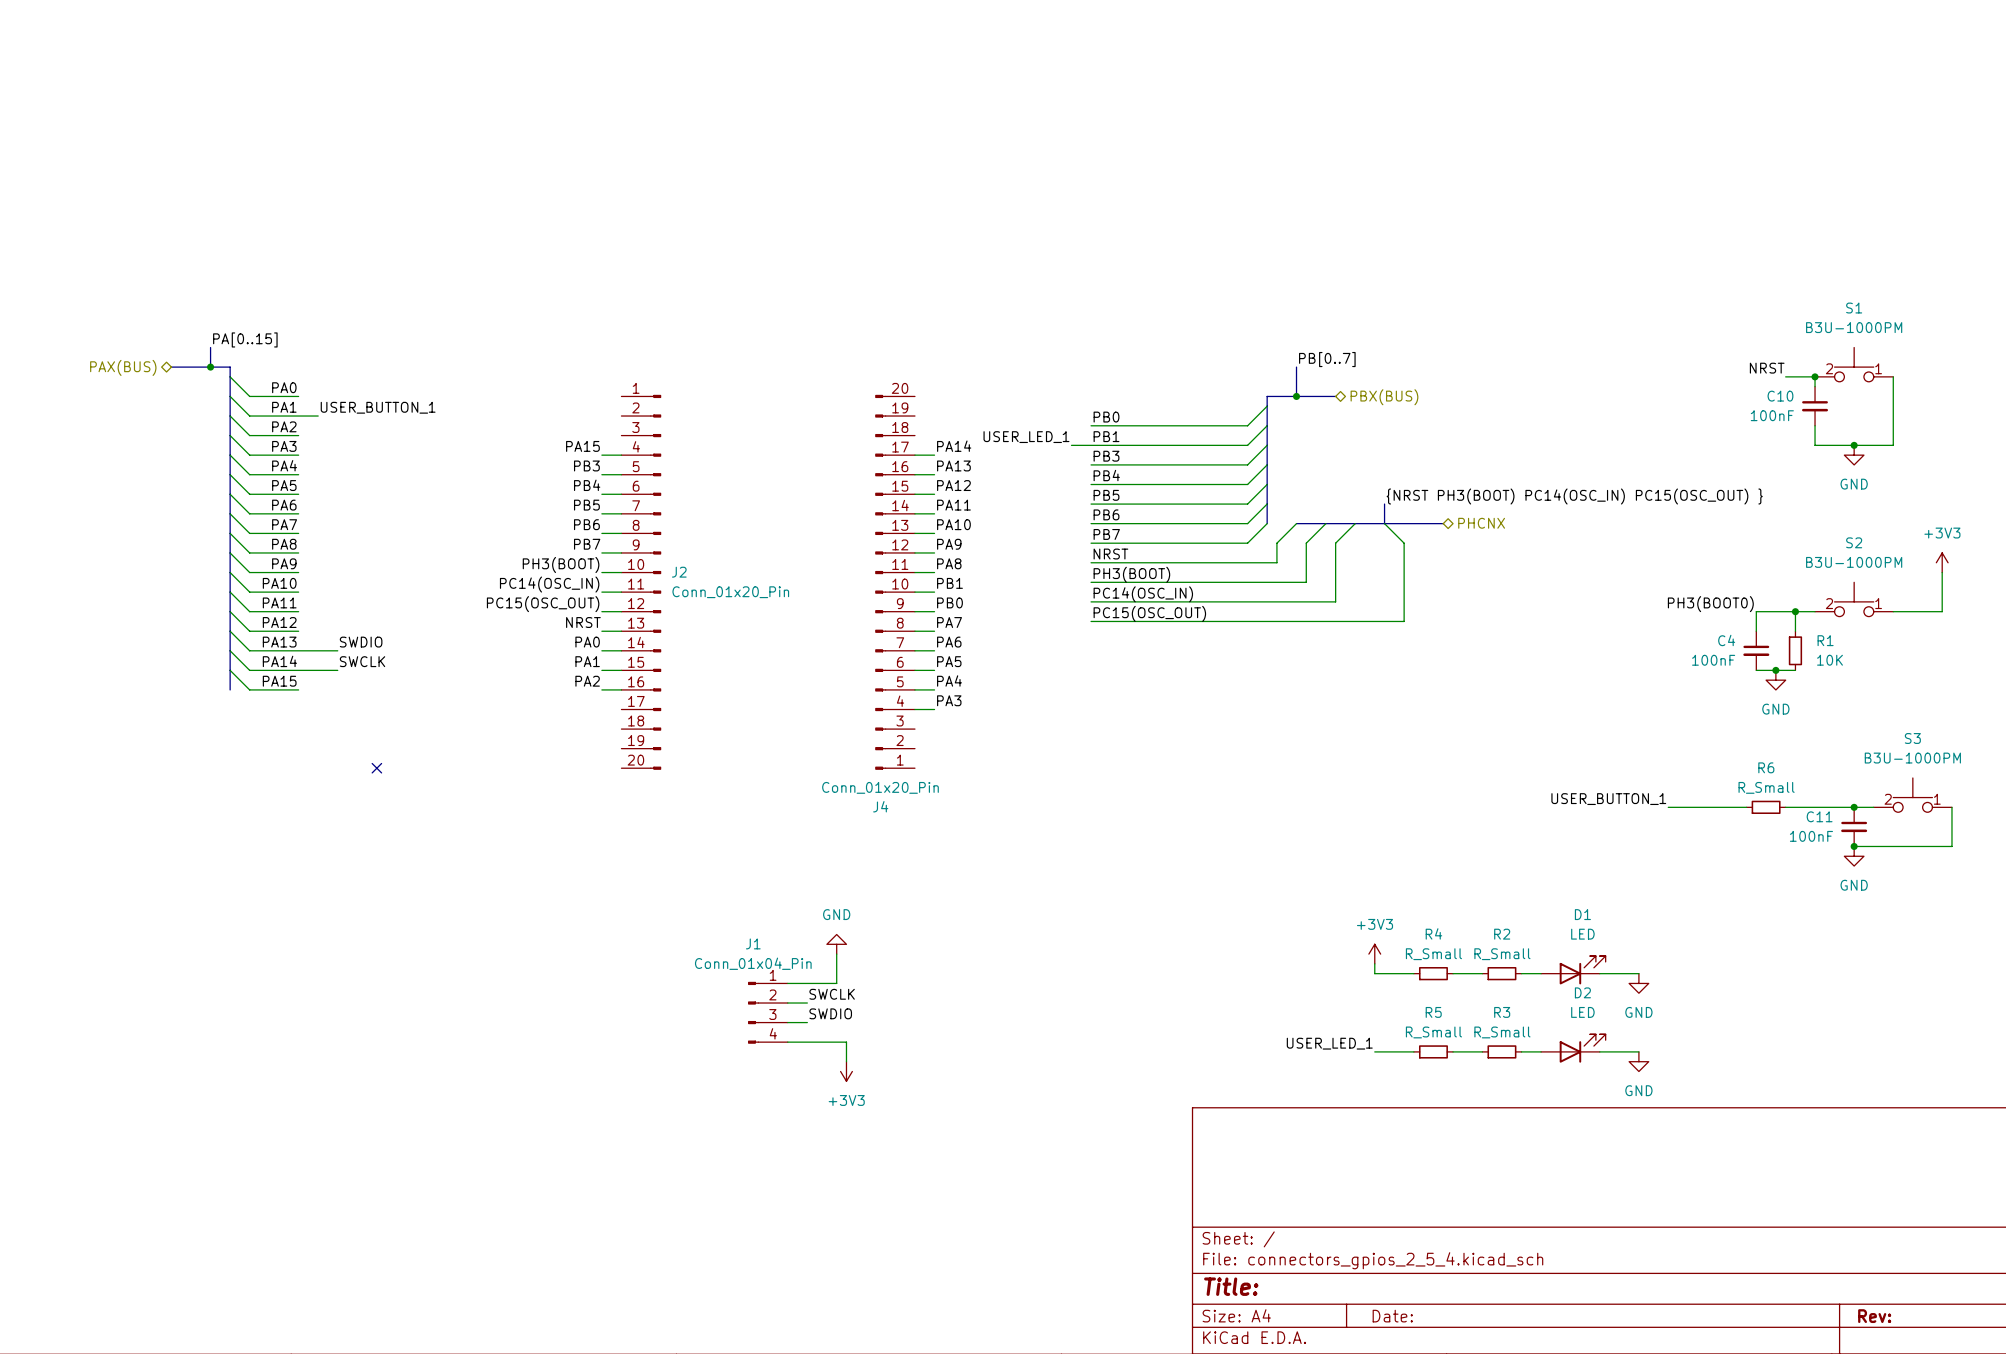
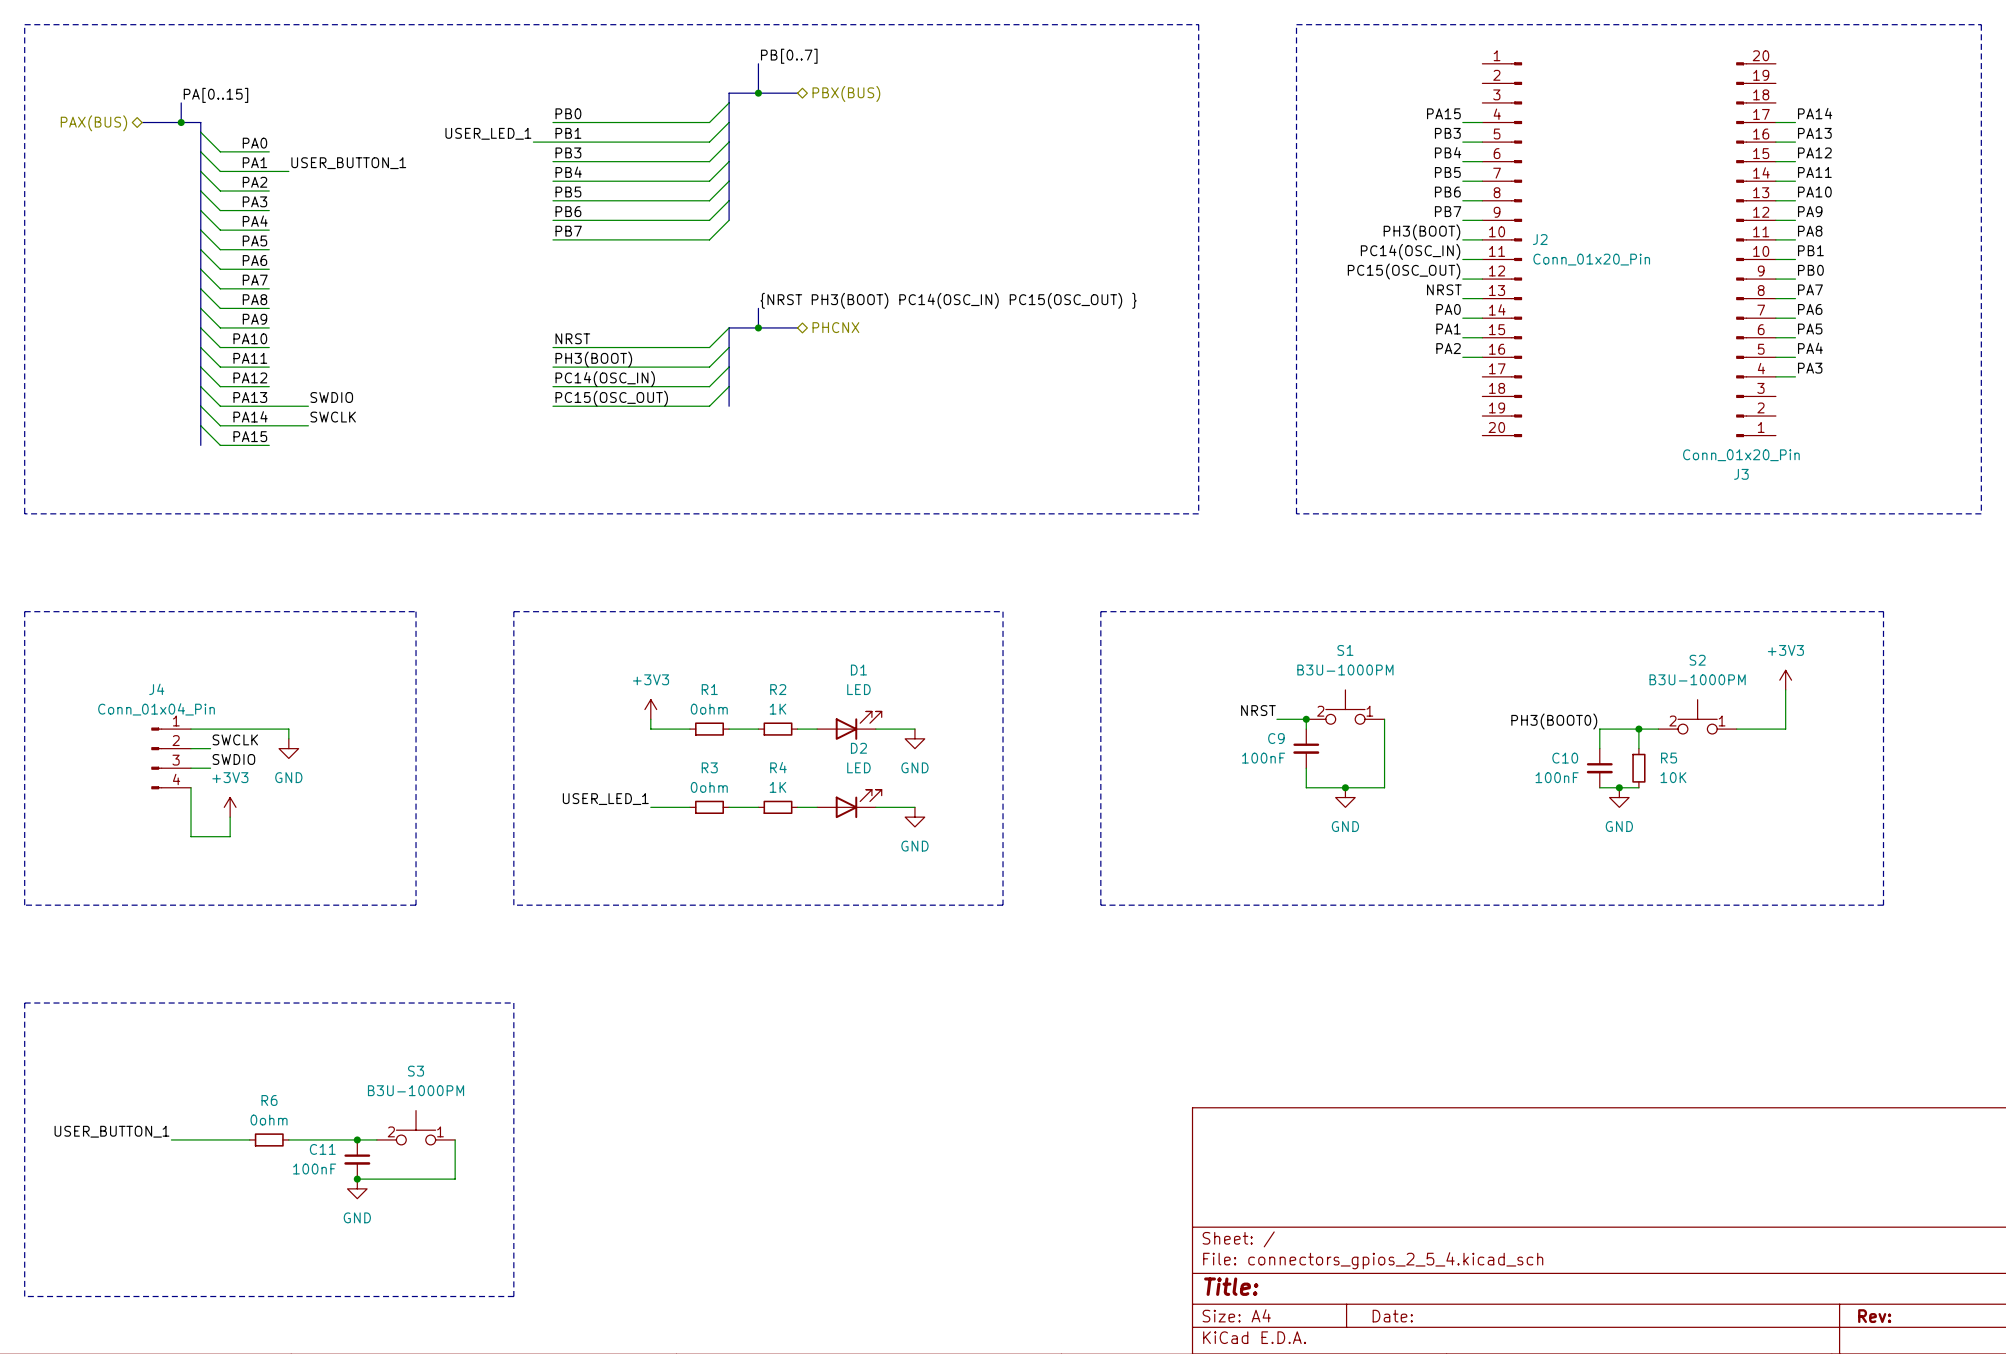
line: none -> (24, 24) (1198, 24) (1198, 513) (24, 513) (24, 24)
line: none -> (1296, 24) (1981, 24) (1981, 513) (1296, 513) (1296, 24)
label: none -> PB[0..7] (789, 56)
bus: none -> (758, 63) (758, 93)
junction: none -> (758, 93)
bus: none -> (797, 93) (729, 93) (729, 220)
hierarchical label: none -> PBX(BUS) (846, 93)
label: none -> PA[0..15] (216, 95)
bus: none -> (181, 102) (181, 122)
wire: none -> (729, 102) (709, 122) (552, 122)
label: none -> PB0 (568, 113)
label: none -> PA15 (1443, 113)
label: none -> PA14 (1815, 113)
bus: none -> (142, 122) (200, 122) (200, 445)
junction: none -> (181, 122)
wire: none -> (729, 122) (709, 142) (533, 142)
wire: none -> (1462, 122) (1482, 122)
wire: none -> (1775, 122) (1795, 122)
hierarchical label: none -> PAX(BUS) (93, 123)
wire: none -> (200, 132) (220, 151) (269, 151)
label: none -> USER_LED_1 (488, 133)
label: none -> PB1 (568, 133)
label: none -> PB3 (1447, 133)
label: none -> PA13 (1814, 133)
wire: none -> (729, 142) (709, 161) (552, 161)
wire: none -> (1462, 142) (1482, 142)
wire: none -> (1775, 142) (1795, 142)
label: none -> PA0 (254, 143)
wire: none -> (200, 151) (220, 171) (288, 171)
label: none -> PB3 (568, 152)
label: none -> PB4 (1448, 152)
label: none -> PA12 (1814, 152)
wire: none -> (729, 161) (709, 181) (552, 181)
wire: none -> (1462, 161) (1482, 161)
wire: none -> (1775, 161) (1795, 161)
label: none -> PA1 (254, 162)
label: none -> USER_BUTTON_1 (348, 163)
wire: none -> (200, 171) (220, 191) (269, 191)
label: none -> PB4 (568, 172)
label: none -> PB5 (1447, 172)
label: none -> PA11 (1814, 172)
wire: none -> (729, 181) (709, 200) (552, 200)
wire: none -> (1462, 181) (1482, 181)
wire: none -> (1775, 181) (1795, 181)
label: none -> PA2 (254, 182)
label: none -> PB5 (568, 192)
label: none -> PB6 (1447, 192)
label: none -> PA10 (1814, 192)
wire: none -> (729, 200) (709, 220) (552, 220)
wire: none -> (1462, 200) (1482, 200)
wire: none -> (1775, 200) (1795, 200)
label: none -> PA3 (254, 201)
wire: none -> (200, 210) (220, 230) (269, 230)
label: none -> PB6 (568, 211)
label: none -> PB7 (1448, 211)
label: none -> PA9 (1810, 211)
wire: none -> (729, 220) (709, 239) (552, 239)
wire: none -> (1462, 220) (1482, 220)
wire: none -> (1775, 220) (1795, 220)
label: none -> PA4 (255, 221)
label: none -> PB7 (568, 231)
label: none -> PA8 (1810, 231)
label: none -> PH3(BOOT) (1421, 232)
wire: none -> (1462, 239) (1482, 239)
wire: none -> (1775, 239) (1795, 239)
label: none -> PA5 (254, 240)
J3: none -> Conn_01x20_Pin (1756, 249)
label: none -> PB1 (1810, 250)
label: none -> PC14(OSC_IN) (1410, 251)
wire: none -> (1462, 259) (1482, 259)
wire: none -> (1775, 259) (1795, 259)
label: none -> PA6 (254, 260)
label: none -> PB0 (1810, 270)
label: none -> PC15(OSC_OUT) (1404, 271)
wire: none -> (1462, 279) (1482, 279)
wire: none -> (1775, 279) (1795, 279)
label: none -> PA7 (255, 280)
label: none -> NRST (1444, 289)
label: none -> PA7 (1810, 289)
wire: none -> (1462, 298) (1482, 298)
wire: none -> (1775, 298) (1795, 298)
label: none -> PA8 (254, 299)
label: none -> {NRST PH3(BOOT) PC14(OSC_IN) PC15(OSC_OUT) } (948, 300)
bus: none -> (758, 308) (758, 327)
label: none -> PA0 (1448, 309)
label: none -> PA6 (1810, 309)
wire: none -> (1462, 318) (1482, 318)
wire: none -> (1775, 318) (1795, 318)
label: none -> PA9 (254, 319)
wire: none -> (729, 327) (709, 347) (552, 347)
junction: none -> (758, 327)
bus: none -> (797, 327) (729, 327) (729, 406)
hierarchical label: none -> PHCNX (835, 327)
label: none -> PA1 (1448, 329)
label: none -> PA5 (1810, 329)
wire: none -> (1462, 337) (1482, 337)
wire: none -> (1775, 337) (1795, 337)
label: none -> PA10 (250, 338)
label: none -> NRST (572, 338)
label: PA[0..15] (245, 339) -> none
bus: (210, 347) (210, 367) -> none
wire: none -> (729, 347) (709, 367) (552, 367)
label: none -> PA2 (1448, 348)
label: none -> PA4 (1810, 348)
wire: none -> (1462, 357) (1482, 357)
wire: none -> (1775, 357) (1795, 357)
label: none -> PA11 (250, 358)
label: none -> PH3(BOOT) (593, 359)
label: PB[0..7] (1327, 359) -> none
S1 position: (1854, 364) -> (1345, 707)
hierarchical label: PAX(BUS) (123, 367) -> none
bus: (171, 367) (230, 367) (230, 689) -> none
junction: (210, 367) -> none
wire: none -> (729, 367) (709, 386) (552, 386)
bus: (1296, 367) (1296, 396) -> none
label: NRST (1767, 368) -> none
label: none -> PA3 (1810, 368)
wire: (230, 376) (249, 396) (298, 396) -> (200, 191) (220, 210) (269, 210)
wire: none -> (1775, 376) (1785, 376)
wire: (1795, 376) (1815, 376) (1815, 386) -> none
junction: (1815, 376) -> none
wire: (1893, 376) (1893, 445) (1815, 445) (1815, 425) -> none
label: none -> PA12 (250, 377)
label: none -> PC14(OSC_IN) (605, 379)
wire: none -> (200, 386) (220, 406) (308, 406)
wire: none -> (729, 386) (709, 406) (552, 406)
label: PA0 (284, 387) -> none
J4 symbol: [875, 394, 915, 770] -> [151, 727, 192, 790]
wire: (230, 396) (249, 416) (318, 416) -> none
junction: (1296, 396) -> none
bus: (1335, 396) (1267, 396) (1267, 523) -> none
label: none -> PA13 (250, 397)
label: none -> SWDIO (331, 397)
hierarchical label: PBX(BUS) (1384, 397) -> none
label: none -> PC15(OSC_OUT) (611, 398)
wire: none -> (200, 406) (220, 425) (308, 425)
wire: (1267, 406) (1247, 425) (1091, 425) -> none
C10 position: (1815, 406) -> (1599, 768)
label: PA1 (284, 407) -> none
label: USER_BUTTON_1 (378, 407) -> none
wire: (230, 416) (249, 435) (298, 435) -> (200, 230) (220, 249) (269, 249)
label: none -> PA14 (250, 416)
label: none -> SWCLK (333, 417)
label: PB0 (1106, 417) -> none
wire: (1267, 425) (1247, 445) (1071, 445) -> none
label: PA2 (284, 426) -> none
wire: (230, 435) (249, 455) (298, 455) -> (200, 249) (220, 269) (269, 269)
label: none -> PA15 (250, 436)
label: PB1 (1106, 436) -> none
label: USER_LED_1 (1026, 437) -> none
wire: (1267, 445) (1247, 464) (1091, 464) -> none
junction: (1854, 445) -> none
label: PA3 (284, 446) -> none
label: PA15 (582, 446) -> none
label: PA14 (954, 446) -> none
wire: (230, 455) (249, 474) (298, 474) -> (200, 269) (220, 288) (269, 288)
wire: (601, 455) (621, 455) -> none
wire: (914, 455) (934, 455) -> none
power symbol: GND (1854, 455) -> none
label: PB3 (1106, 456) -> none
wire: (1267, 464) (1247, 484) (1091, 484) -> none
label: PA4 (284, 465) -> none
label: PB3 (586, 465) -> none
label: PA13 (953, 465) -> none
wire: (230, 474) (249, 494) (298, 494) -> (200, 288) (220, 308) (269, 308)
wire: (601, 474) (621, 474) -> none
wire: (914, 474) (934, 474) -> none
label: PB4 (1106, 475) -> none
wire: (1267, 484) (1247, 504) (1091, 504) -> none
label: PA5 (284, 485) -> none
label: PB4 (587, 485) -> none
label: PA12 (953, 485) -> none
wire: (230, 494) (249, 513) (298, 513) -> (200, 308) (220, 327) (269, 327)
wire: (601, 494) (621, 494) -> none
wire: (914, 494) (934, 494) -> none
label: PB5 (1106, 495) -> none
label: {NRST PH3(BOOT) PC14(OSC_IN) PC15(OSC_OUT) } (1574, 496) -> none
wire: (1267, 504) (1247, 523) (1091, 523) -> none
bus: (1384, 504) (1384, 523) -> none
label: PA6 (284, 505) -> none
label: PB5 (586, 505) -> none
label: PA11 (953, 505) -> none
wire: (230, 513) (249, 533) (298, 533) -> (200, 327) (220, 347) (269, 347)
label: PB6 (1106, 514) -> none
wire: (1267, 523) (1247, 543) (1091, 543) -> none
wire: (1296, 523) (1276, 543) (1276, 562) (1091, 562) -> none
bus: (1296, 523) (1443, 523) -> none
wire: (1325, 523) (1306, 543) (1306, 582) (1091, 582) -> none
wire: (1355, 523) (1335, 543) (1335, 601) (1091, 601) -> none
wire: (1384, 523) (1404, 543) (1404, 621) (1091, 621) -> none
hierarchical label: PHCNX (1481, 523) -> none
label: PA7 (284, 524) -> none
label: PB6 (586, 524) -> none
label: PA10 (953, 524) -> none
wire: (230, 533) (249, 552) (298, 552) -> (200, 347) (220, 367) (269, 367)
wire: (601, 533) (621, 533) -> none
wire: (914, 533) (934, 533) -> none
label: PB7 (1106, 534) -> none
label: PA8 (284, 544) -> none
label: PB7 (587, 544) -> none
label: PA9 (949, 544) -> none
wire: (230, 552) (249, 572) (298, 572) -> (200, 367) (220, 386) (269, 386)
wire: (601, 552) (621, 552) -> none
wire: (914, 552) (934, 552) -> none
label: NRST (1110, 554) -> none
power symbol: +3V3 (1942, 562) -> none
label: PA9 (284, 563) -> none
label: PA8 (949, 563) -> none
label: PH3(BOOT) (561, 564) -> none
wire: (230, 572) (249, 592) (298, 592) -> none
wire: (601, 572) (621, 572) -> none
wire: (914, 572) (934, 572) -> none
wire: (1942, 572) (1942, 611) (1893, 611) -> none
label: PH3(BOOT) (1131, 574) -> none
J2 position: (641, 582) -> (1502, 249)
label: PA10 (279, 583) -> none
label: PB1 (949, 583) -> none
label: PC14(OSC_IN) (549, 584) -> none
wire: (230, 592) (249, 611) (298, 611) -> none
wire: (601, 592) (621, 592) -> none
wire: (914, 592) (934, 592) -> none
label: PC14(OSC_IN) (1143, 594) -> none
S2 position: (1854, 599) -> (1697, 716)
label: PA11 (279, 602) -> none
label: PB0 (949, 602) -> none
label: PC15(OSC_OUT) (543, 604) -> none
label: PH3(BOOT0) (1710, 604) -> none
line: none -> (24, 611) (416, 611) (416, 905) (24, 905) (24, 611)
wire: (230, 611) (249, 631) (298, 631) -> (200, 425) (220, 445) (269, 445)
line: none -> (513, 611) (1003, 611) (1003, 905) (513, 905) (513, 611)
line: none -> (1100, 611) (1883, 611) (1883, 905) (1100, 905) (1100, 611)
wire: (1795, 611) (1795, 631) -> none
junction: (1795, 611) -> none
wire: (1815, 611) (1756, 611) (1756, 631) -> none
label: PC15(OSC_OUT) (1149, 613) -> none
label: PA12 (279, 622) -> none
label: NRST (583, 622) -> none
label: PA7 (949, 622) -> none
wire: (230, 631) (249, 650) (337, 650) -> none
wire: (601, 631) (621, 631) -> none
wire: (914, 631) (934, 631) -> (797, 729) (817, 729)
R1 name position: R1 (1825, 640) -> R1 (709, 689)
label: PA13 (279, 642) -> none
label: SWDIO (361, 642) -> none
label: PA0 (587, 642) -> none
label: PA6 (949, 642) -> none
wire: (230, 650) (249, 670) (337, 670) -> none
wire: (601, 650) (621, 650) -> none
wire: (914, 650) (934, 650) -> none
C4: 100nF (1756, 650) -> none
R1 rotation: 0° (1795, 650) -> 90° clockwise (709, 729)
R1 position: (1795, 650) -> (709, 729)
R1 value: 10K (1830, 660) -> 0ohm (709, 709)
label: PA14 (279, 661) -> none
label: SWCLK (362, 661) -> none
label: PA1 (587, 661) -> none
label: PA5 (949, 661) -> none
wire: (230, 670) (249, 689) (298, 689) -> none
wire: (601, 670) (621, 670) -> none
wire: (914, 670) (934, 670) -> none
wire: (1756, 670) (1795, 670) -> none
junction: (1775, 670) -> none
label: PA4 (949, 680) -> none
power symbol: GND (1775, 680) -> none
power symbol: none -> +3V3 (1785, 680)
label: PA15 (279, 681) -> none
label: PA2 (587, 681) -> none
wire: (601, 689) (621, 689) -> none
wire: (914, 689) (934, 689) -> none
wire: none -> (1785, 689) (1785, 729) (1736, 729)
label: PA3 (949, 700) -> none
power symbol: none -> +3V3 (650, 709)
wire: (914, 709) (934, 709) -> (797, 807) (817, 807)
label: none -> NRST (1258, 710)
wire: none -> (650, 719) (650, 729) (689, 729)
wire: none -> (1276, 719) (1306, 719) (1306, 729)
junction: none -> (1306, 719)
wire: none -> (1384, 719) (1384, 787) (1306, 787) (1306, 768)
label: none -> PH3(BOOT0) (1554, 721)
wire: none -> (191, 729) (288, 729) (288, 738)
wire: none -> (729, 729) (758, 729)
wire: none -> (1638, 729) (1638, 748)
junction: none -> (1638, 729)
wire: none -> (1658, 729) (1599, 729) (1599, 748)
power symbol: none -> GND (914, 738)
label: none -> SWCLK (235, 739)
wire: none -> (191, 748) (210, 748)
power symbol: none -> GND (288, 748)
C9: none -> 100nF (1306, 748)
label: none -> SWDIO (233, 759)
wire: none -> (191, 768) (210, 768)
no-connect mark: (376, 768) -> none
wire: none -> (191, 787) (191, 836) (230, 836) (230, 817)
J4 value: Conn_01x20_Pin (880, 787) -> Conn_01x04_Pin (156, 709)
junction: none -> (1345, 787)
junction: none -> (1619, 787)
R6 value: R_Small (1766, 787) -> 0ohm (269, 1120)
S3 position: (1912, 795) -> (416, 1127)
power symbol: none -> GND (1345, 797)
power symbol: none -> GND (1619, 797)
label: none -> USER_LED_1 (605, 799)
label: USER_BUTTON_1 (1608, 799) -> none
J4 name position: J4 (880, 806) -> J4 (156, 689)
power symbol: none -> +3V3 (230, 807)
wire: none -> (650, 807) (689, 807)
wire: none -> (729, 807) (758, 807)
wire: none -> (875, 807) (914, 807)
wire: (1668, 807) (1746, 807) -> none
R6 position: (1766, 807) -> (269, 1139)
wire: (1785, 807) (1873, 807) -> none
junction: (1854, 807) -> none
wire: (1951, 807) (1951, 846) (1854, 846) -> none
power symbol: none -> GND (914, 817)
C11 position: (1854, 826) -> (357, 1159)
junction: (1854, 846) -> none
power symbol: GND (1854, 856) -> none
power symbol: GND (836, 944) -> none
wire: (836, 954) (836, 983) (787, 983) -> none
power symbol: +3V3 (1374, 954) -> none
R4 value: R_Small (1433, 954) -> 1K (777, 787)
R2 value: R_Small (1502, 954) -> 1K (777, 709)
wire: (1374, 963) (1374, 973) (1413, 973) -> none
D1 position: (1573, 970) -> (849, 725)
R4 position: (1433, 973) -> (777, 807)
wire: (1453, 973) (1482, 973) -> none
R2 position: (1501, 973) -> (777, 729)
wire: (1521, 973) (1541, 973) -> none
wire: (1599, 973) (1638, 973) -> (1599, 787) (1638, 787)
power symbol: GND (1638, 983) -> none
label: SWCLK (832, 994) -> none
line: none -> (24, 1003) (24, 1296) (513, 1296) (513, 1003) (24, 1003)
wire: (787, 1003) (807, 1003) -> none
J1: Conn_01x04_Pin (767, 1012) -> none
label: SWDIO (830, 1013) -> none
wire: (787, 1022) (807, 1022) -> none
R5 value: R_Small (1433, 1032) -> 10K (1673, 777)
R3 value: R_Small (1502, 1032) -> 0ohm (709, 787)
wire: (787, 1042) (846, 1042) (846, 1061) -> none
label: USER_LED_1 (1329, 1043) -> none
D2 position: (1573, 1048) -> (849, 803)
wire: (1374, 1051) (1413, 1051) -> none
R5 rotation: 0° (1433, 1051) -> 90° clockwise (1638, 768)
R5 position: (1433, 1051) -> (1638, 768)
wire: (1453, 1051) (1482, 1051) -> none
R3 position: (1501, 1051) -> (709, 807)
wire: (1521, 1051) (1541, 1051) -> none
wire: (1599, 1051) (1638, 1051) -> none
power symbol: GND (1638, 1061) -> none
power symbol: +3V3 (846, 1071) -> none
label: none -> USER_BUTTON_1 (111, 1131)
wire: none -> (171, 1139) (249, 1139)
wire: none -> (288, 1139) (376, 1139)
junction: none -> (357, 1139)
wire: none -> (455, 1139) (455, 1179) (357, 1179)
junction: none -> (357, 1179)
power symbol: none -> GND (357, 1188)

